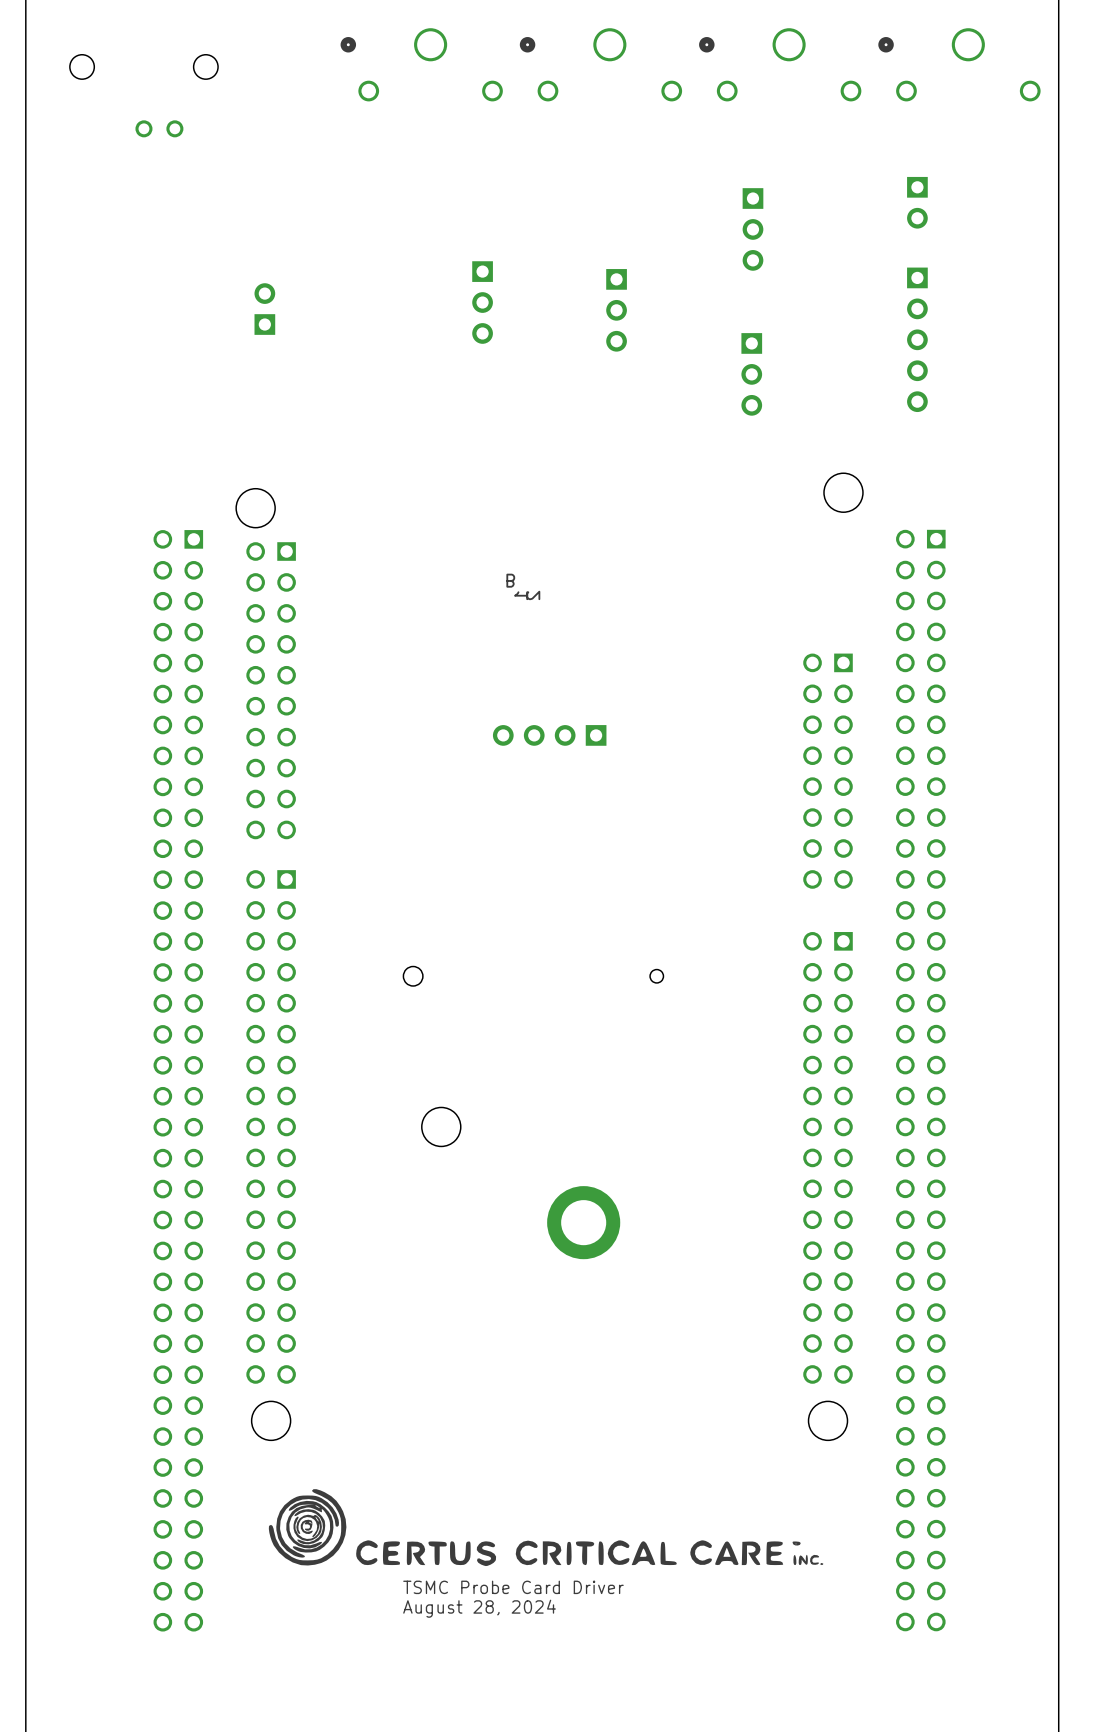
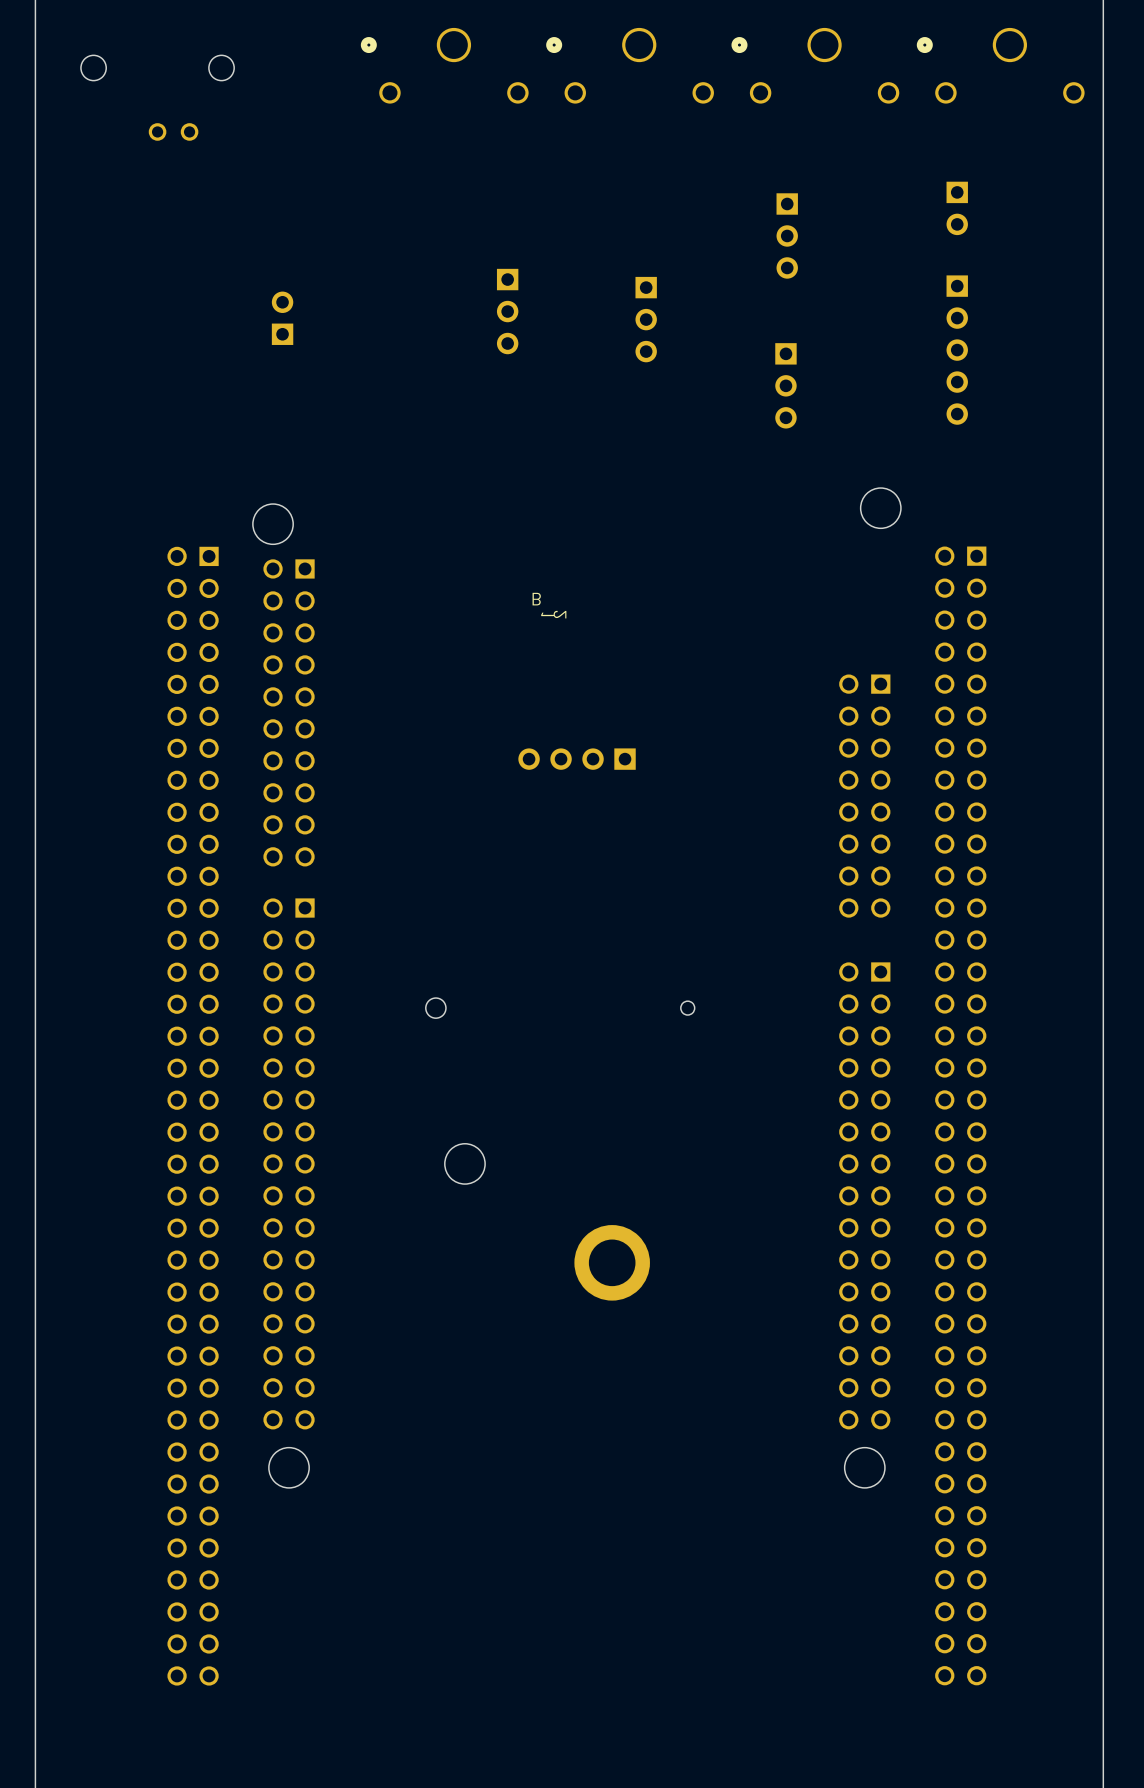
drawing: [268, 1489, 824, 1567] -> none
text: TSMC Probe Card Driver (513, 1587) -> none
text: August 28, 2024 (479, 1608) -> none

